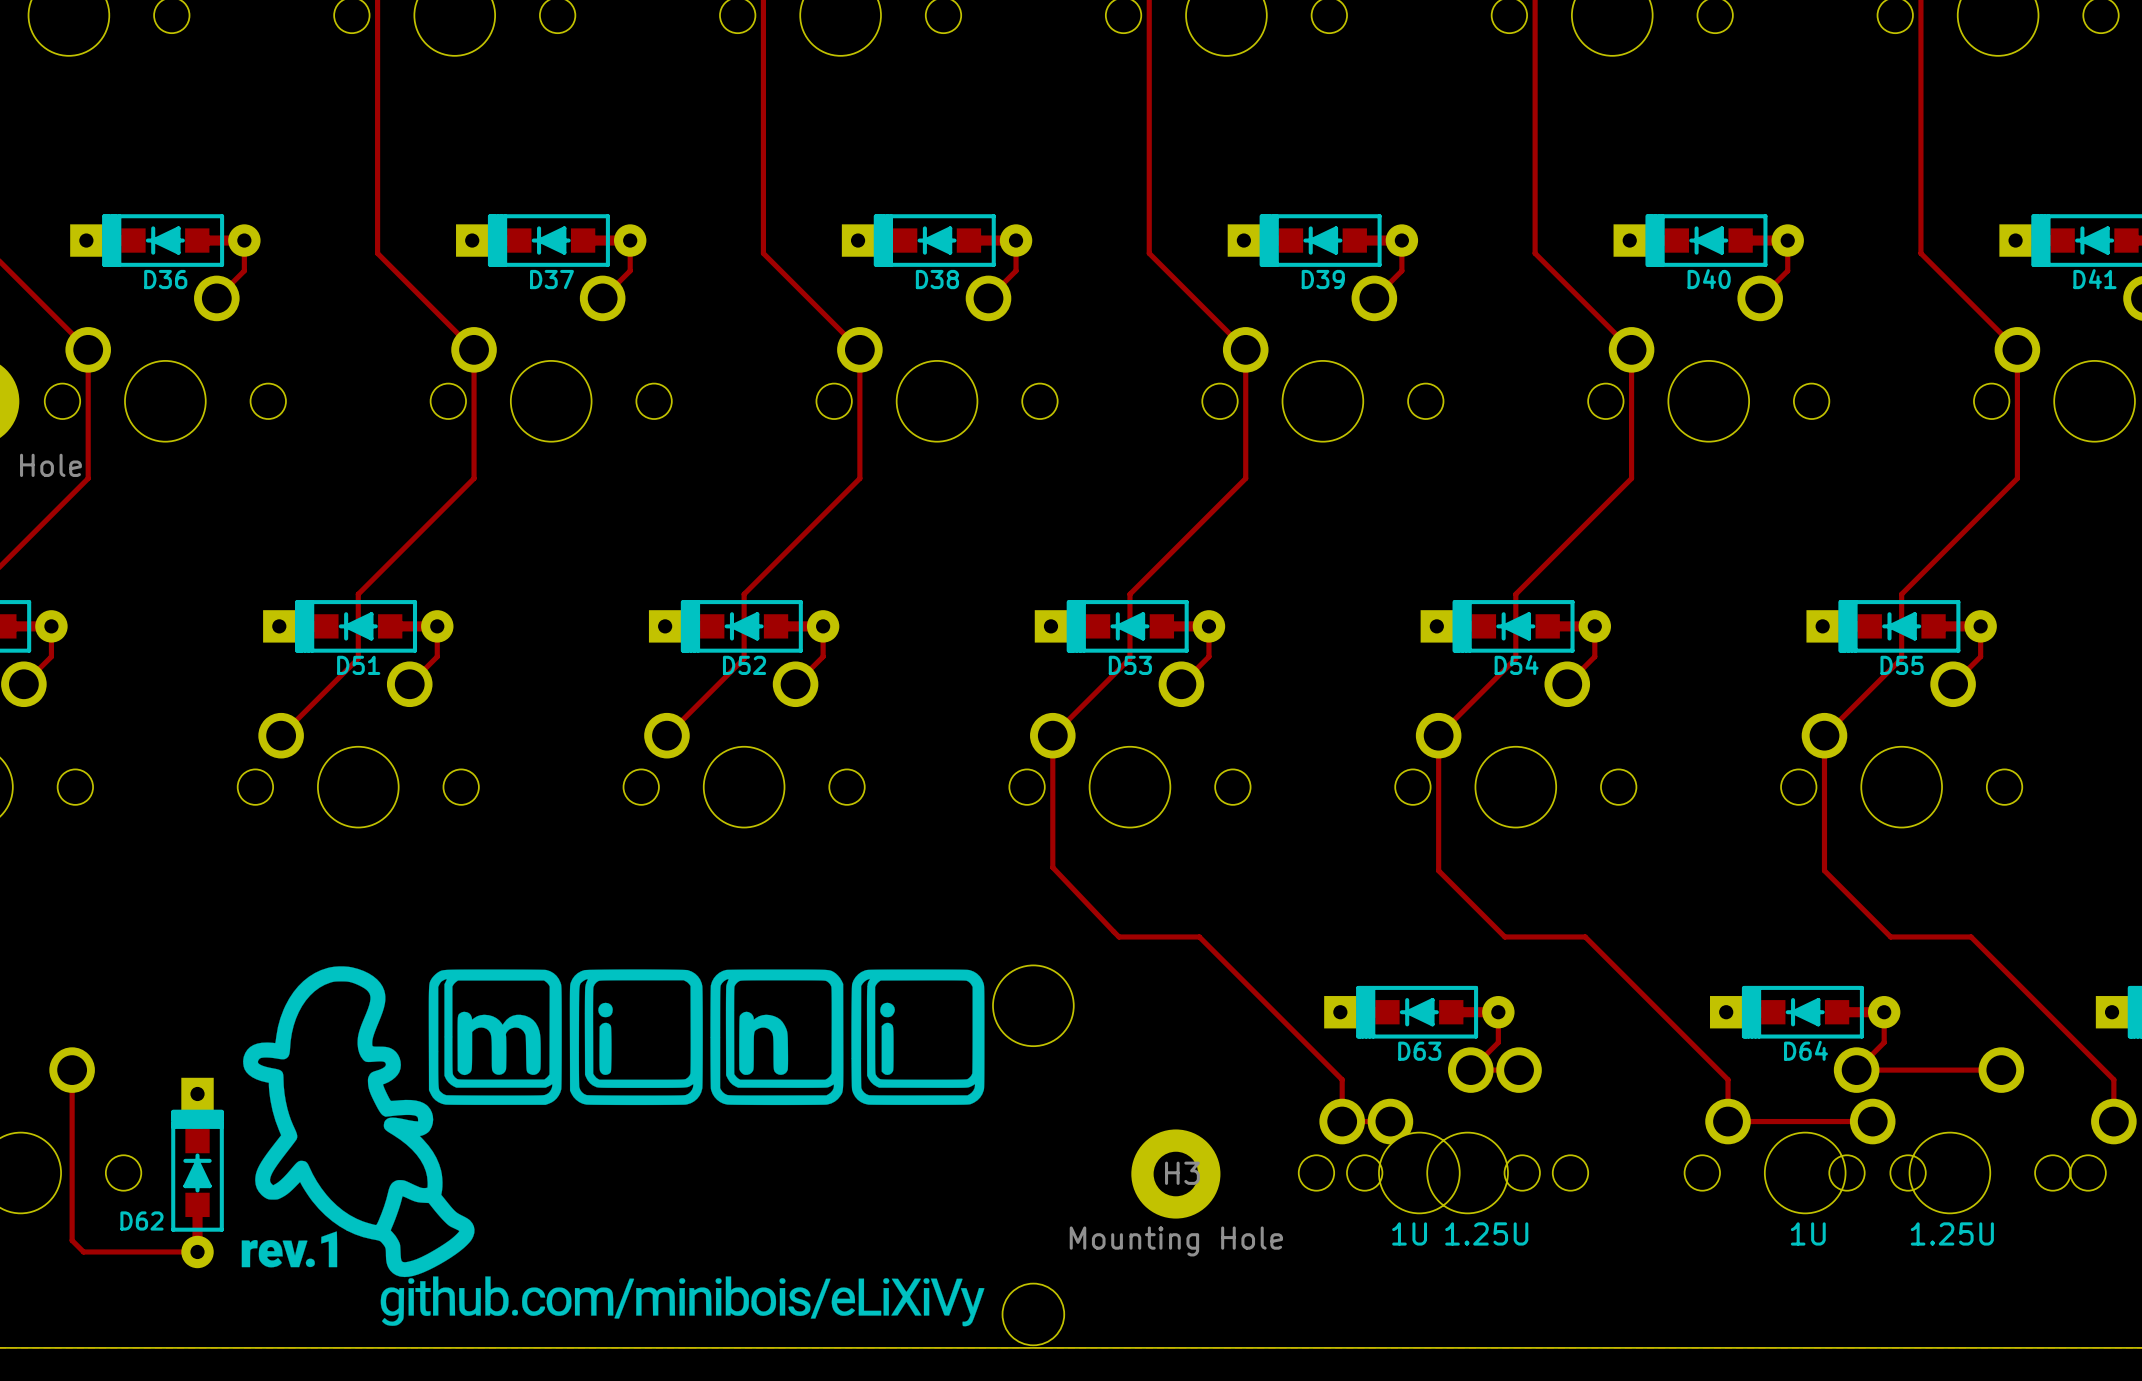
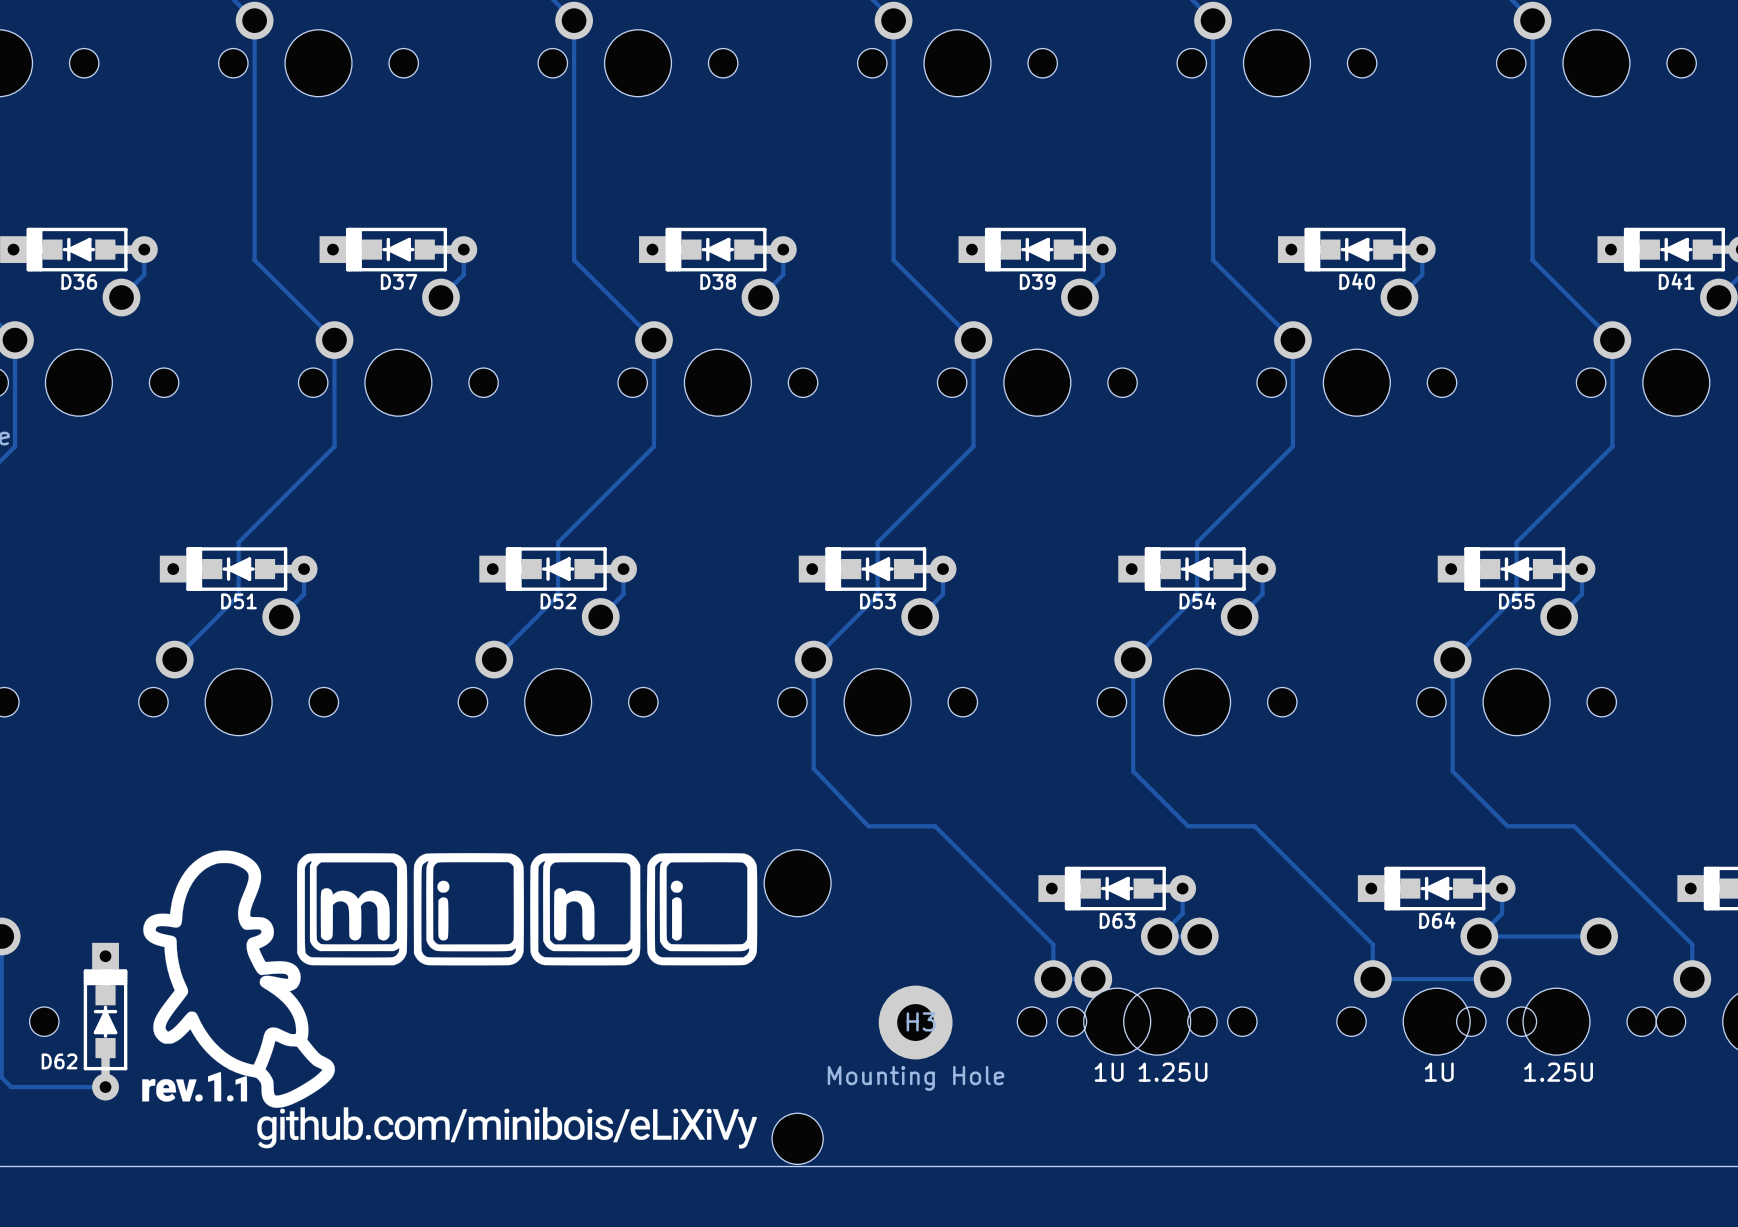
drawing shape: [241, 966, 985, 1327] -> [142, 850, 758, 1149]

